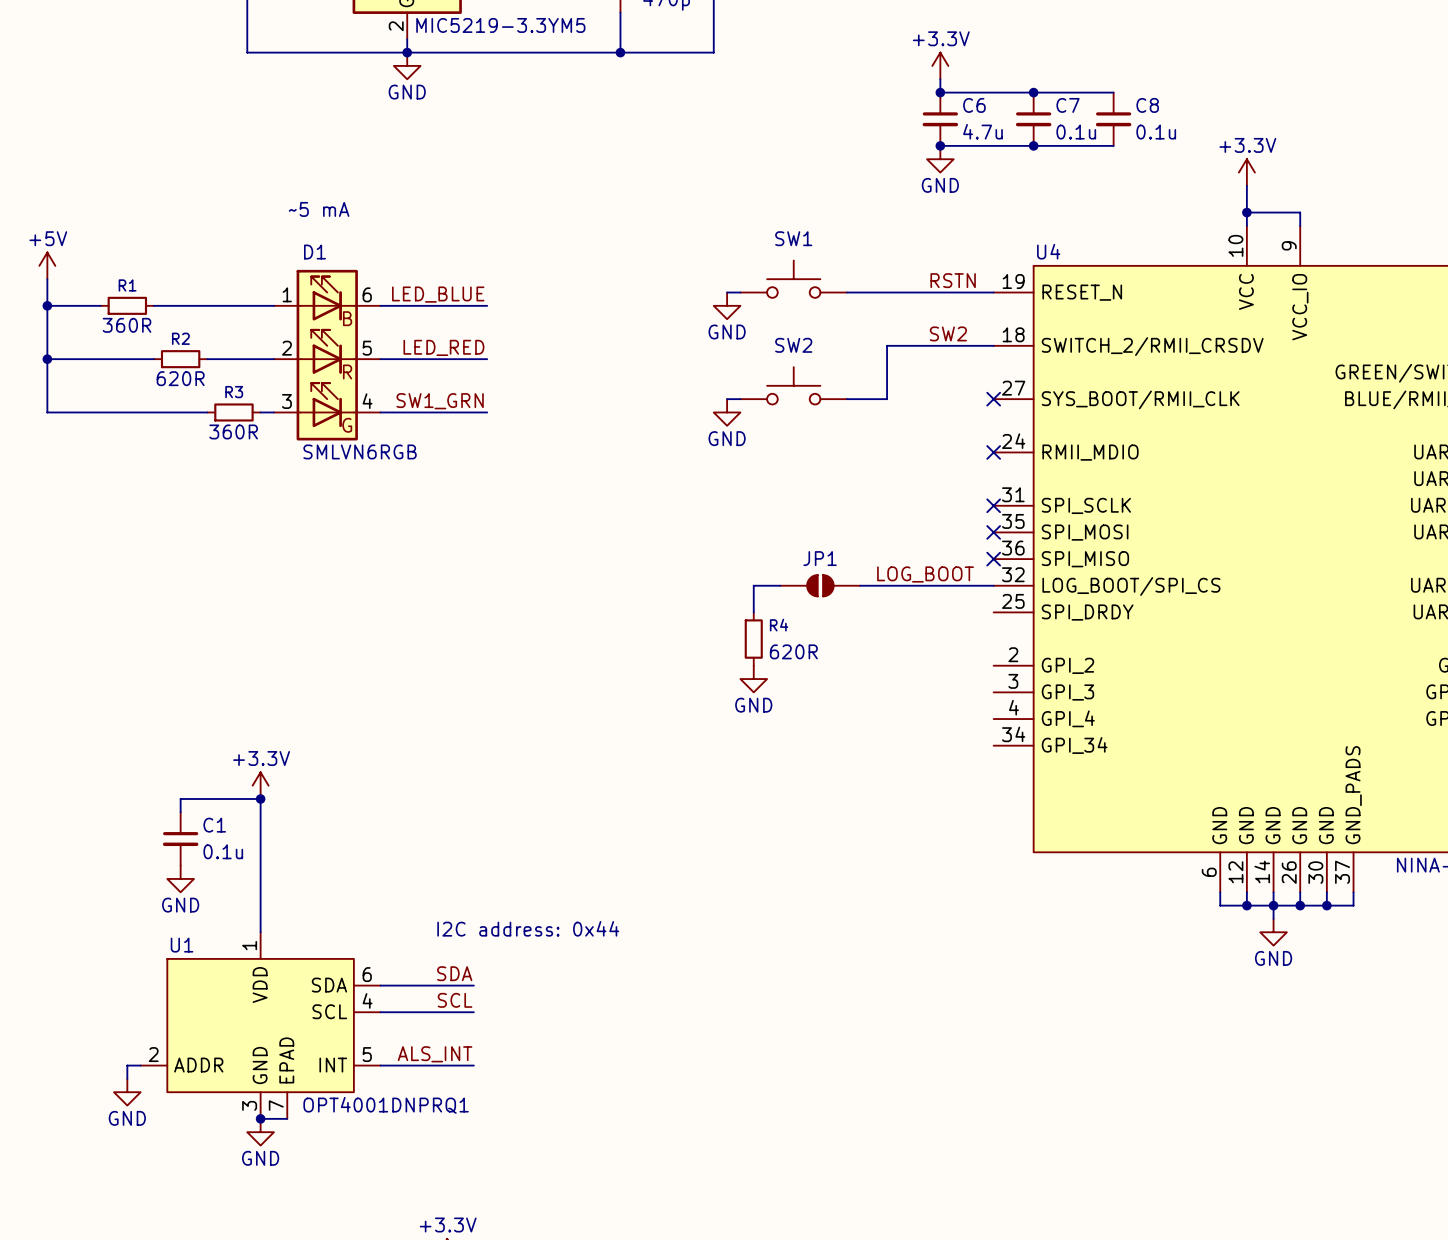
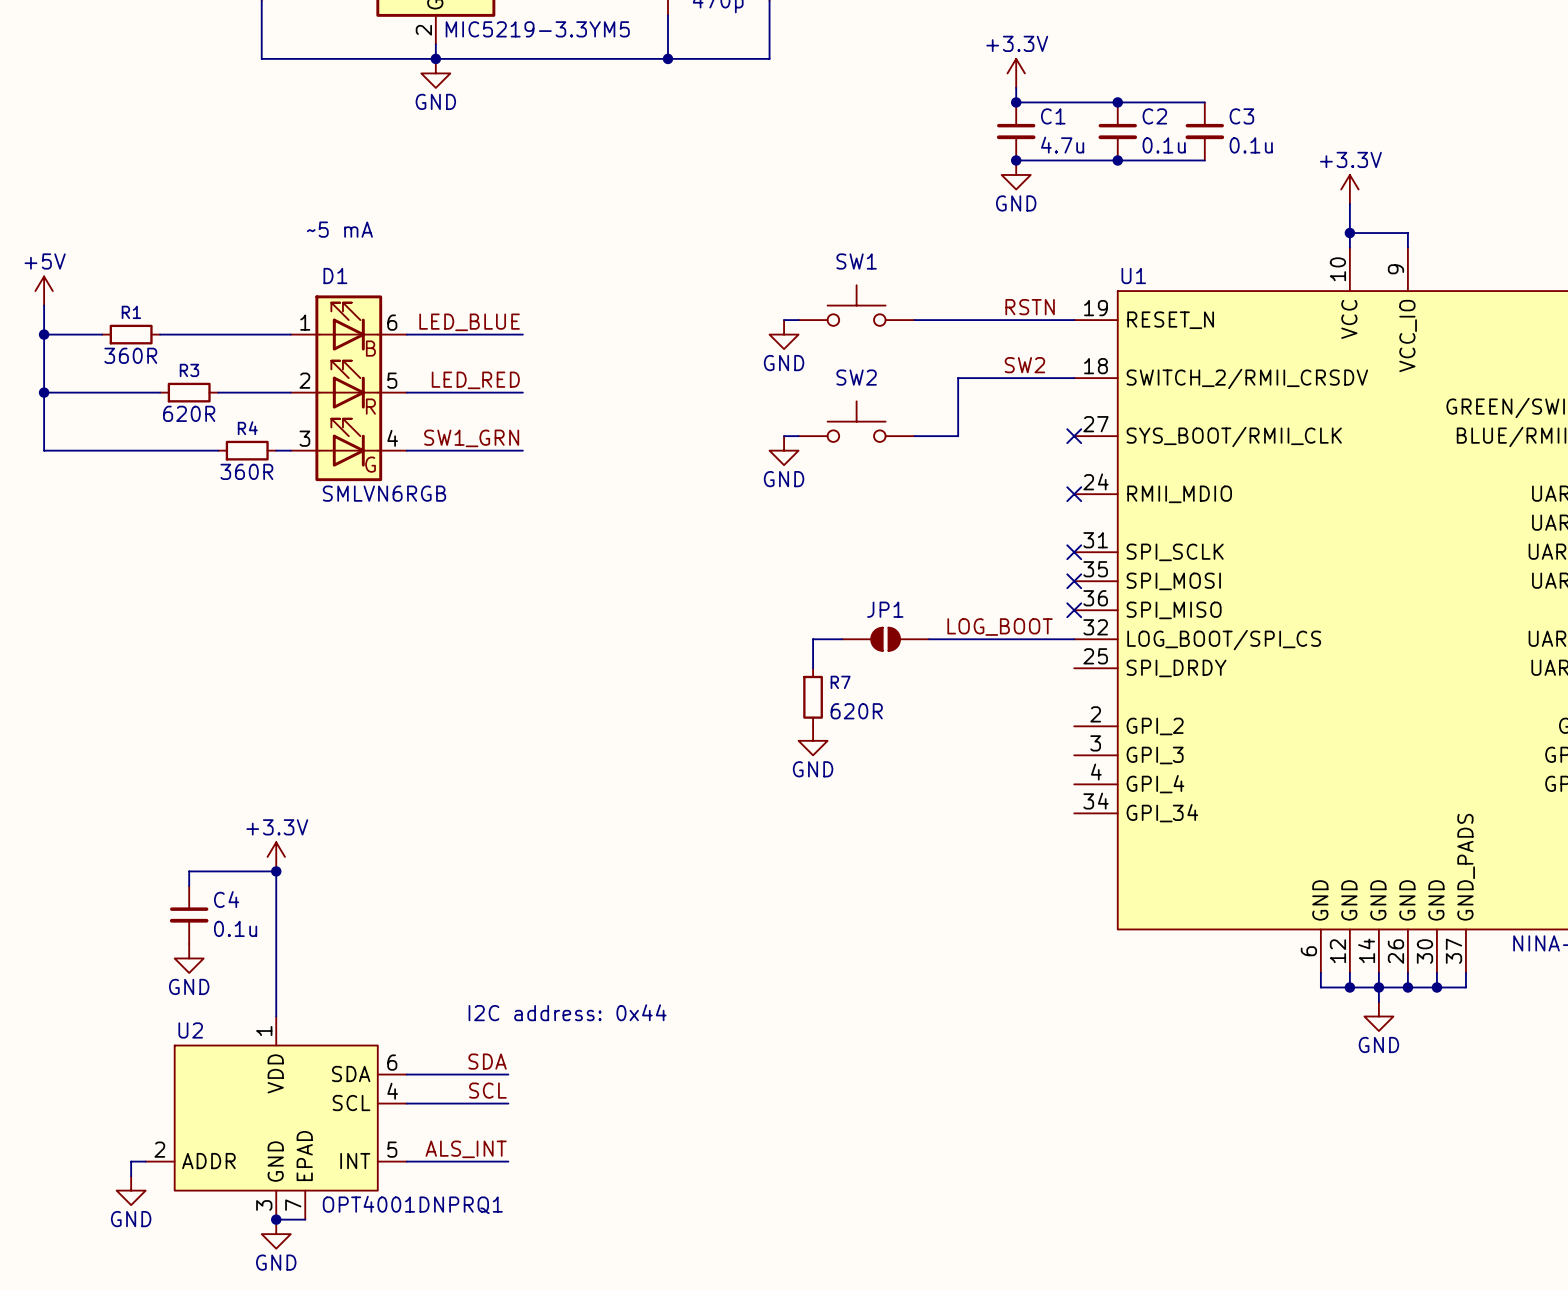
C6 name: C6 (974, 105) -> C1 (1053, 116)
C7 name: C7 (1068, 105) -> C2 (1154, 116)
C8 name: C8 (1147, 105) -> C3 (1241, 116)
U4 name: U4 (1048, 251) -> U1 (1133, 276)
R2 name: R2 (180, 338) -> R3 (189, 370)
R3 name: R3 (234, 392) -> R4 (247, 428)
R4 name: R4 (779, 625) -> R7 (840, 682)
C1 name: C1 (214, 825) -> C4 (226, 899)
U1 name: U1 (182, 945) -> U2 (190, 1030)

